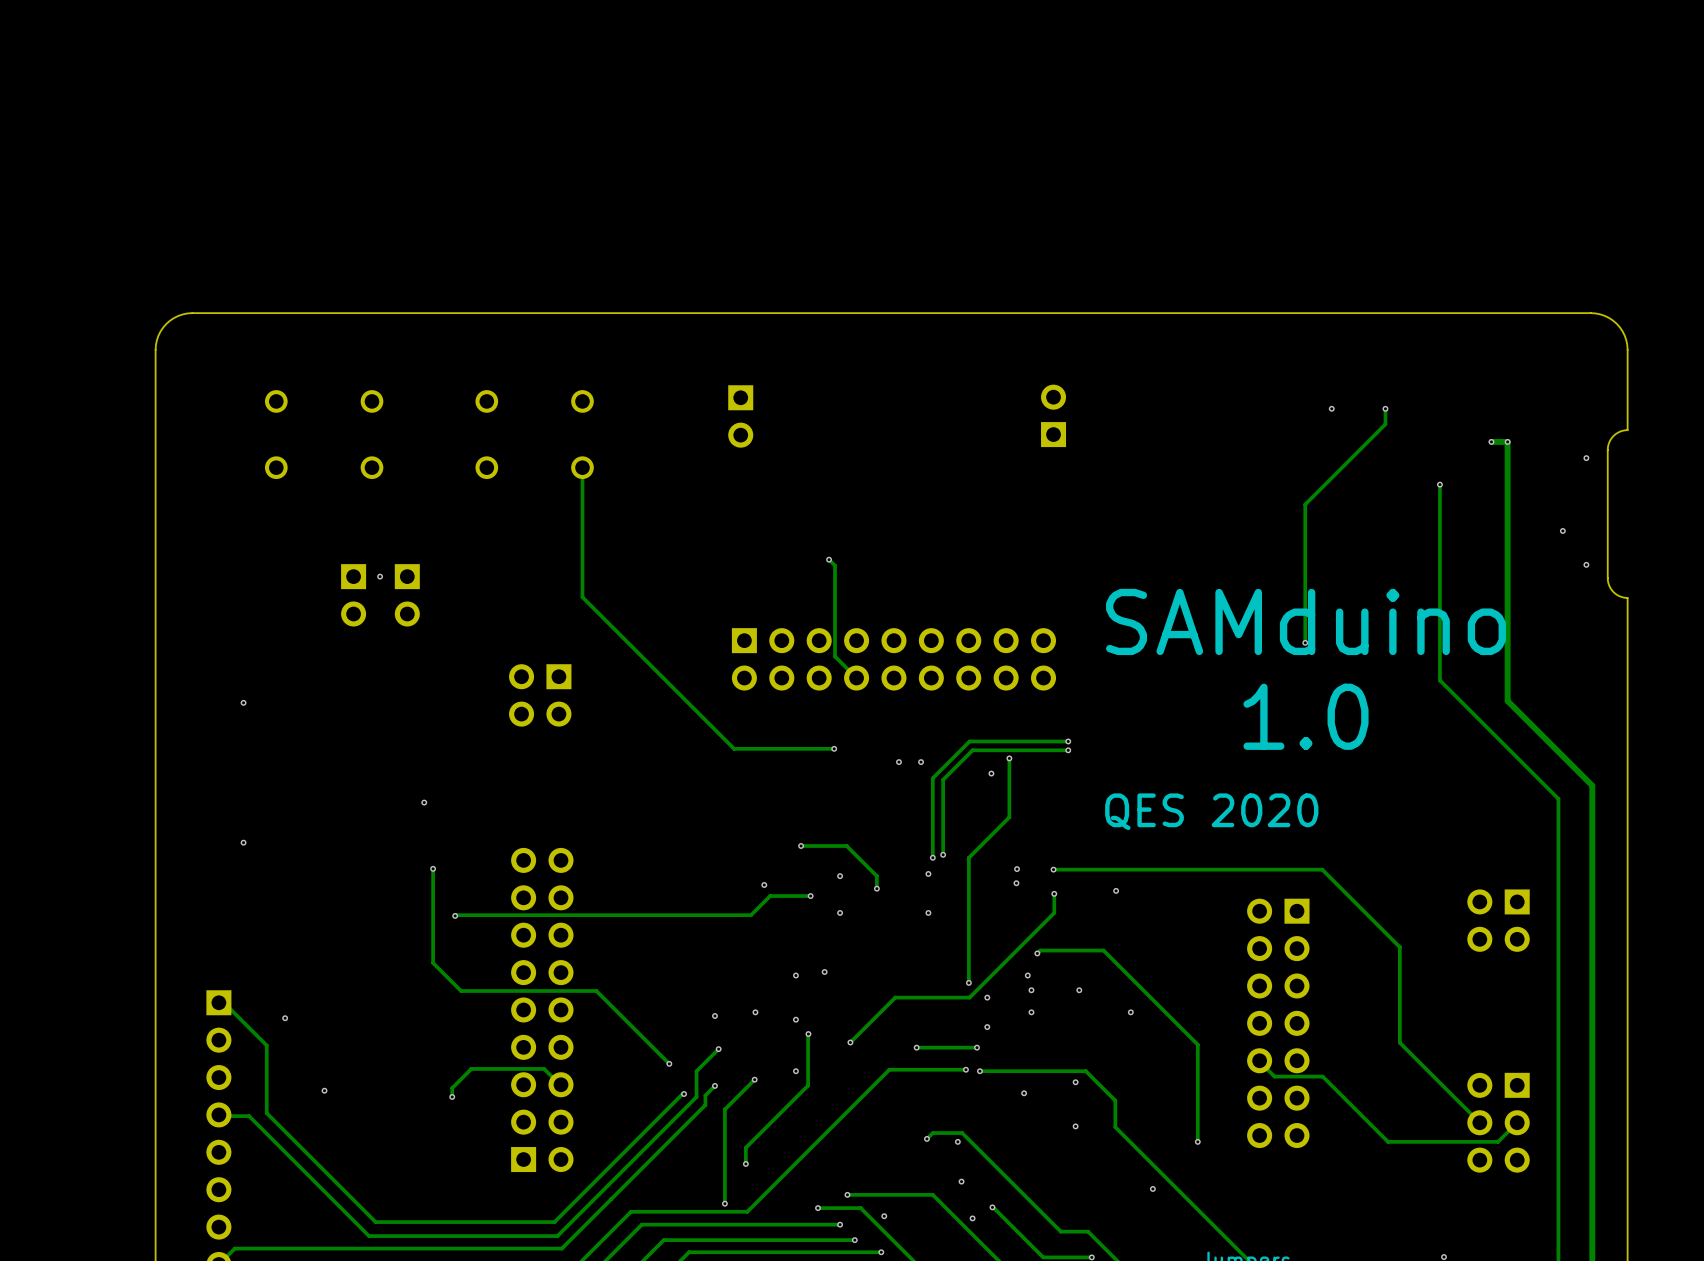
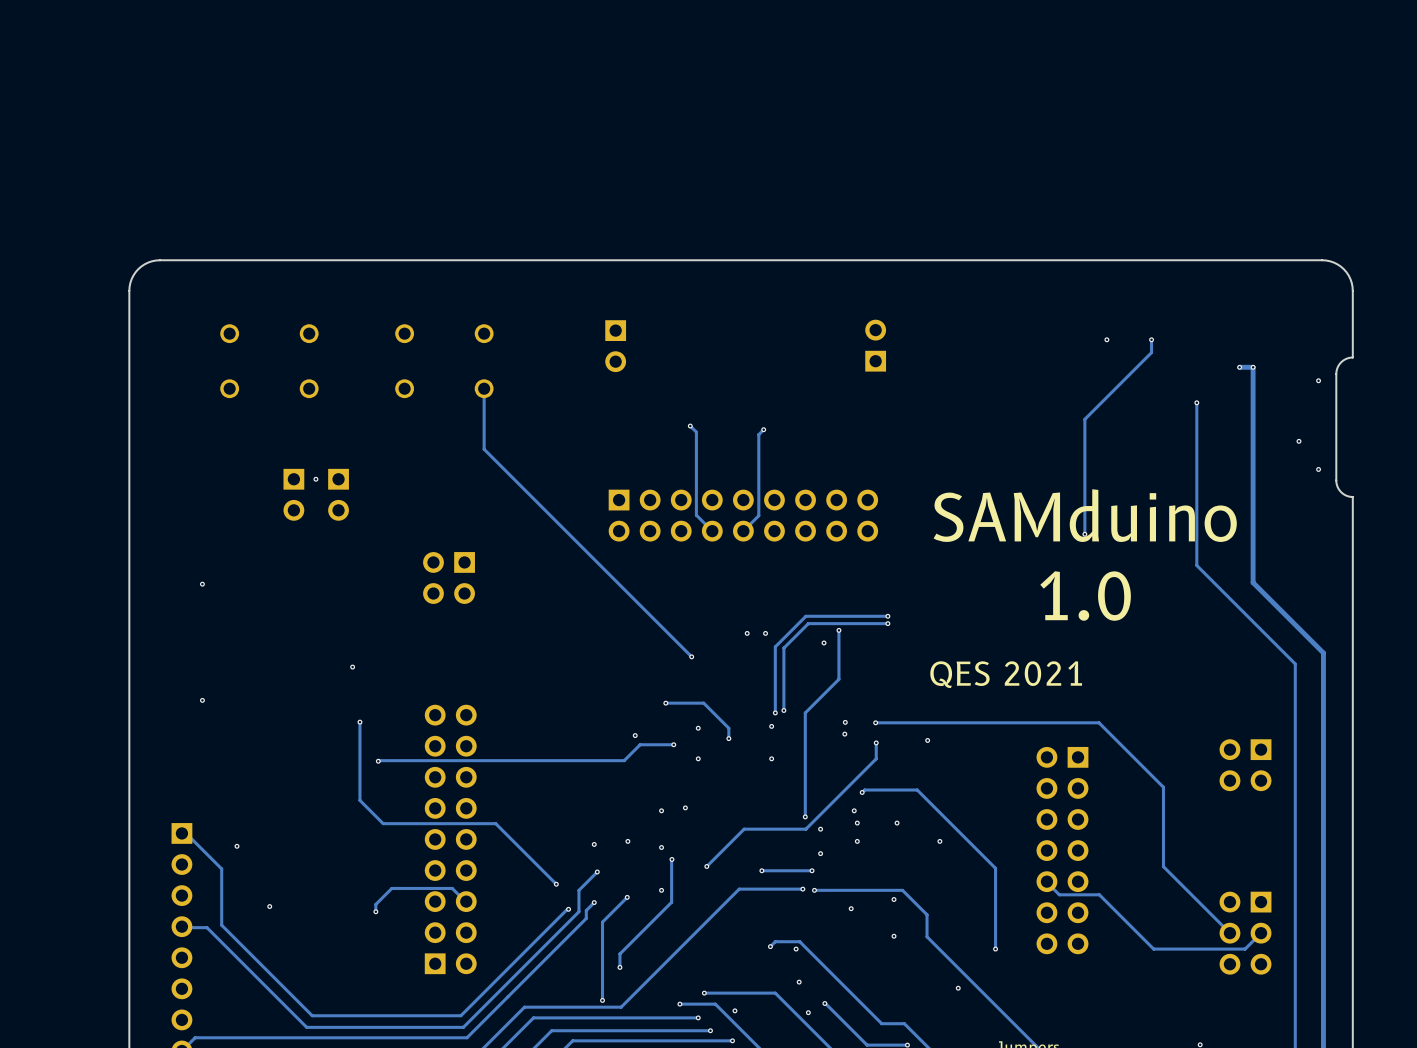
track: none -> (690, 426) (696, 432) (696, 515) (712, 531)
track: none -> (763, 429) (758, 434) (758, 515) (743, 531)
via: none -> (763, 429)
track: (582, 540) (582, 597) (734, 748) (834, 748) -> (484, 449) (691, 656)
track: (829, 559) (835, 565) (835, 656) (856, 678) -> none
via position: (829, 559) -> (690, 426)
part position: (893, 659) -> (743, 515)
via position: (834, 748) -> (691, 656)
text: QES 2020 (1211, 811) -> QES 2021 (1006, 674)

